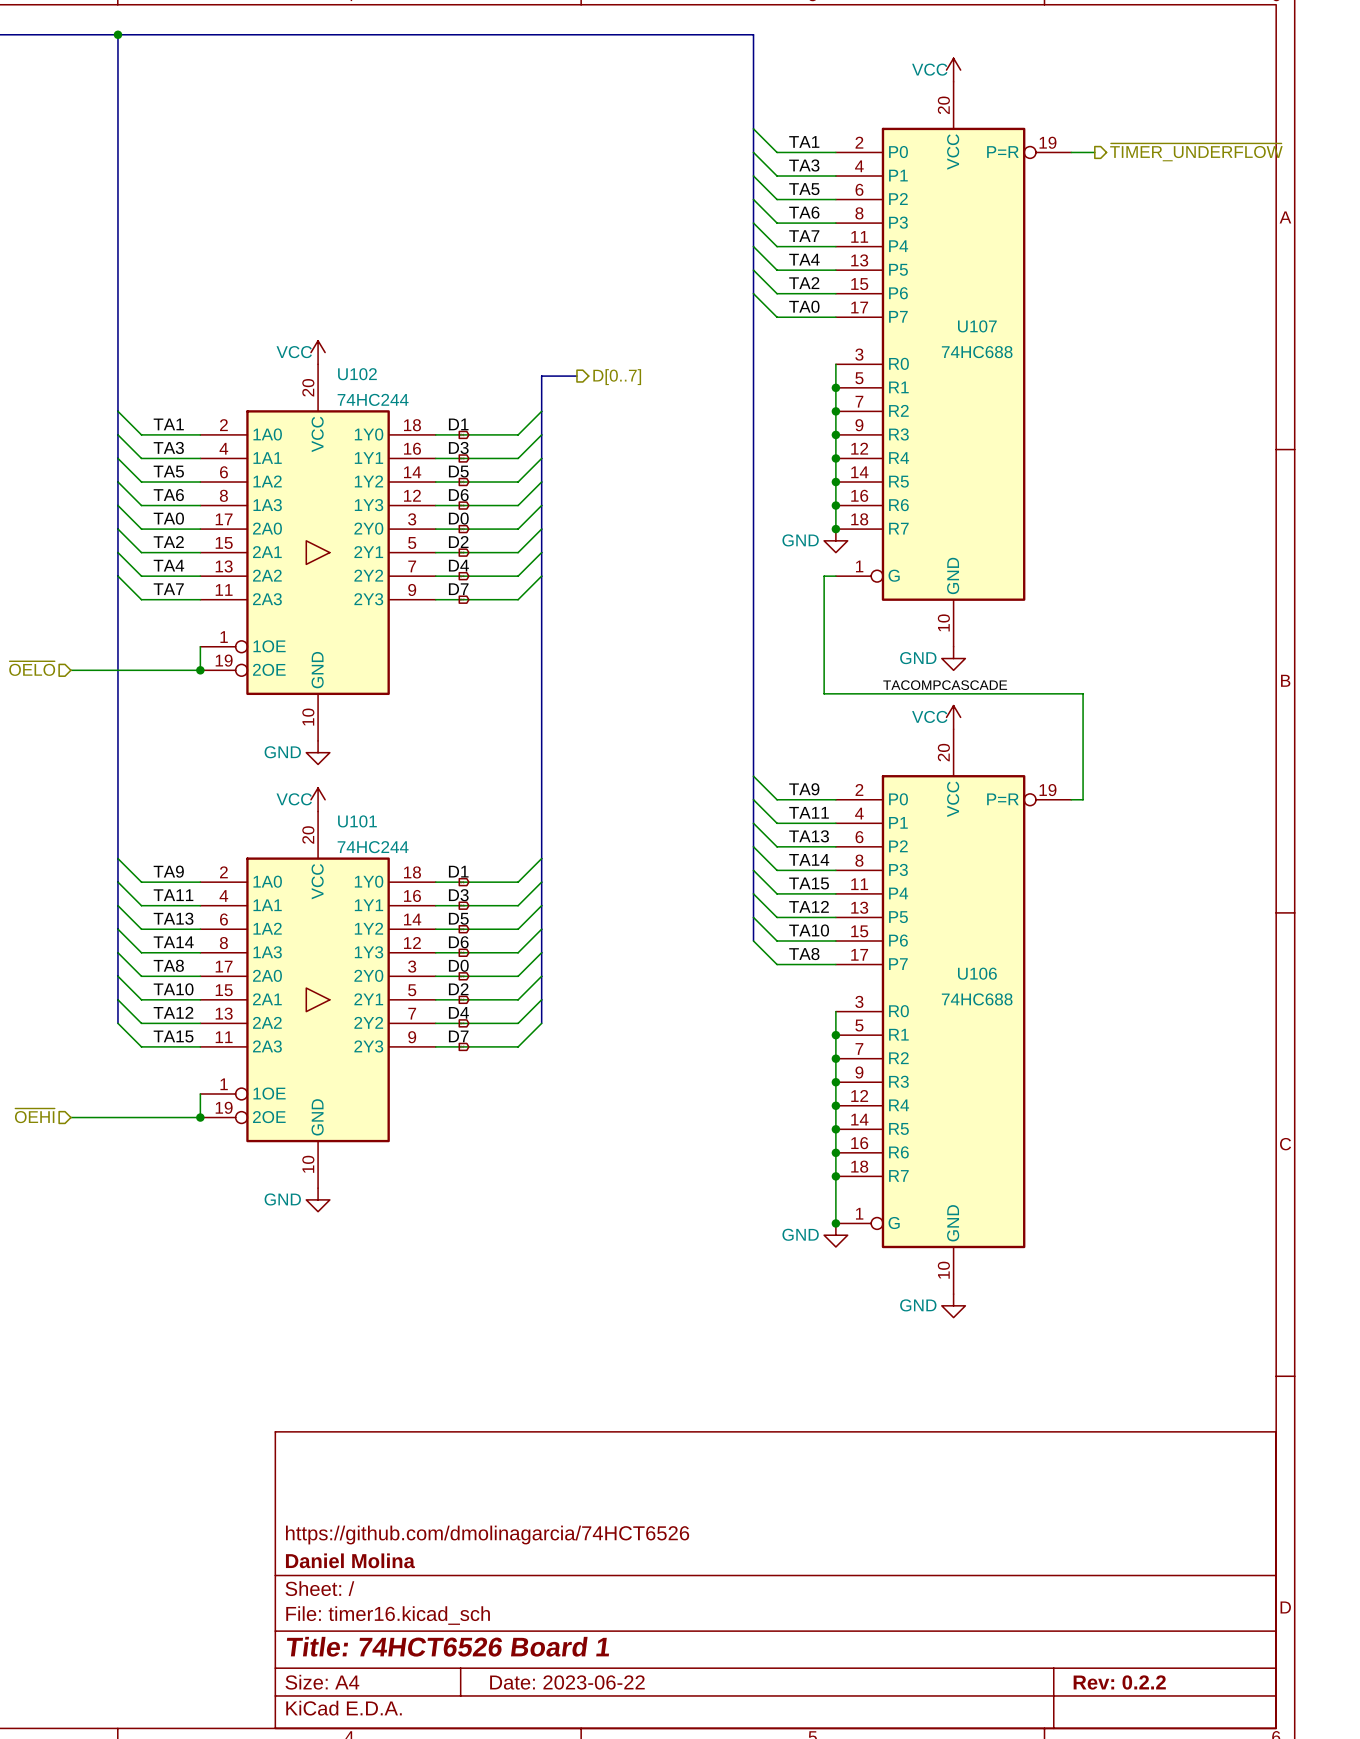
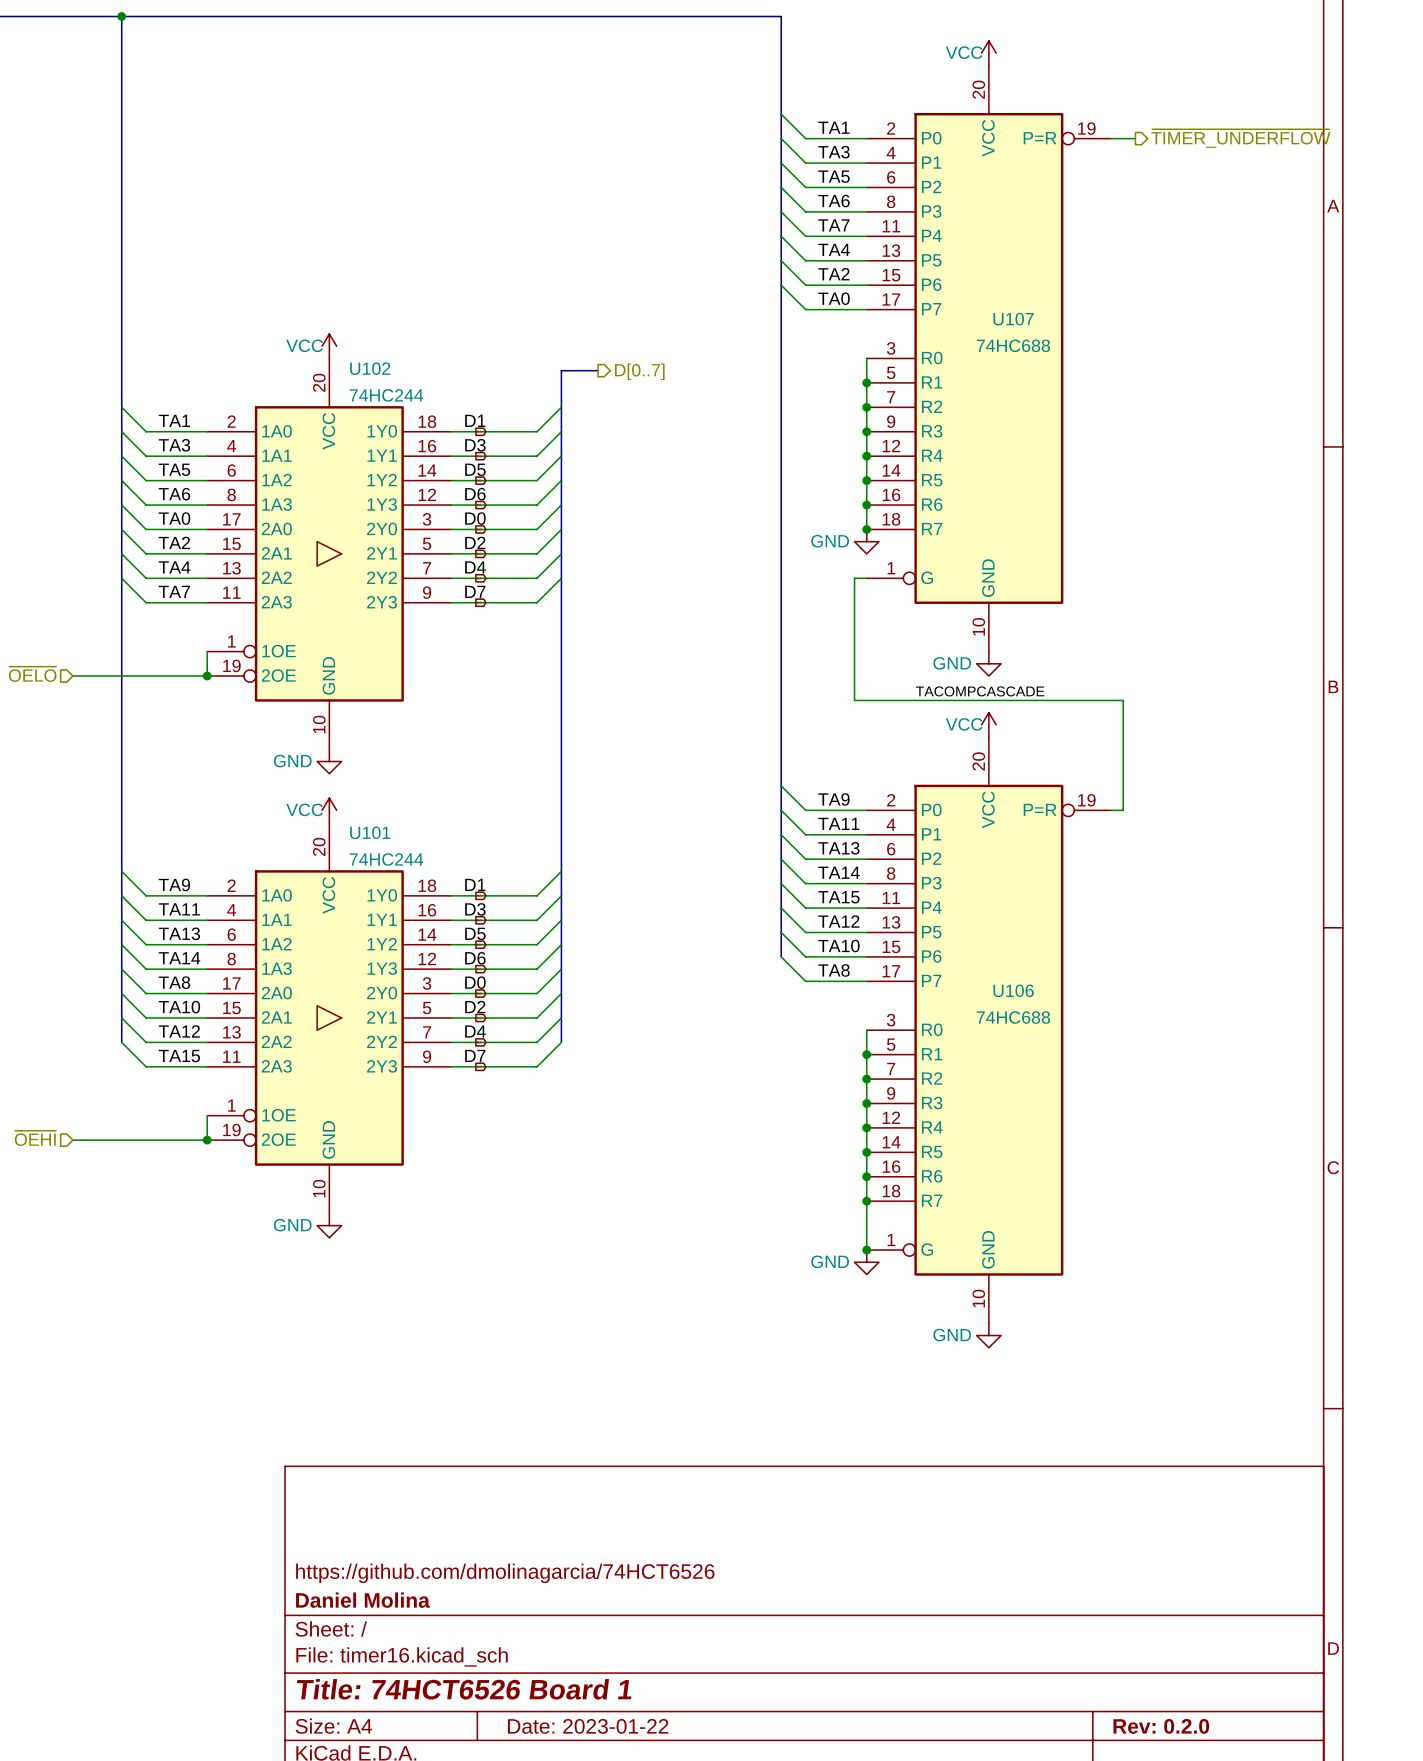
title block: Date: 2023-06-22 (567, 1682) -> Date: 2023-01-22 (588, 1726)
title block: Rev: 0.2.2 (1119, 1682) -> Rev: 0.2.0 (1161, 1726)

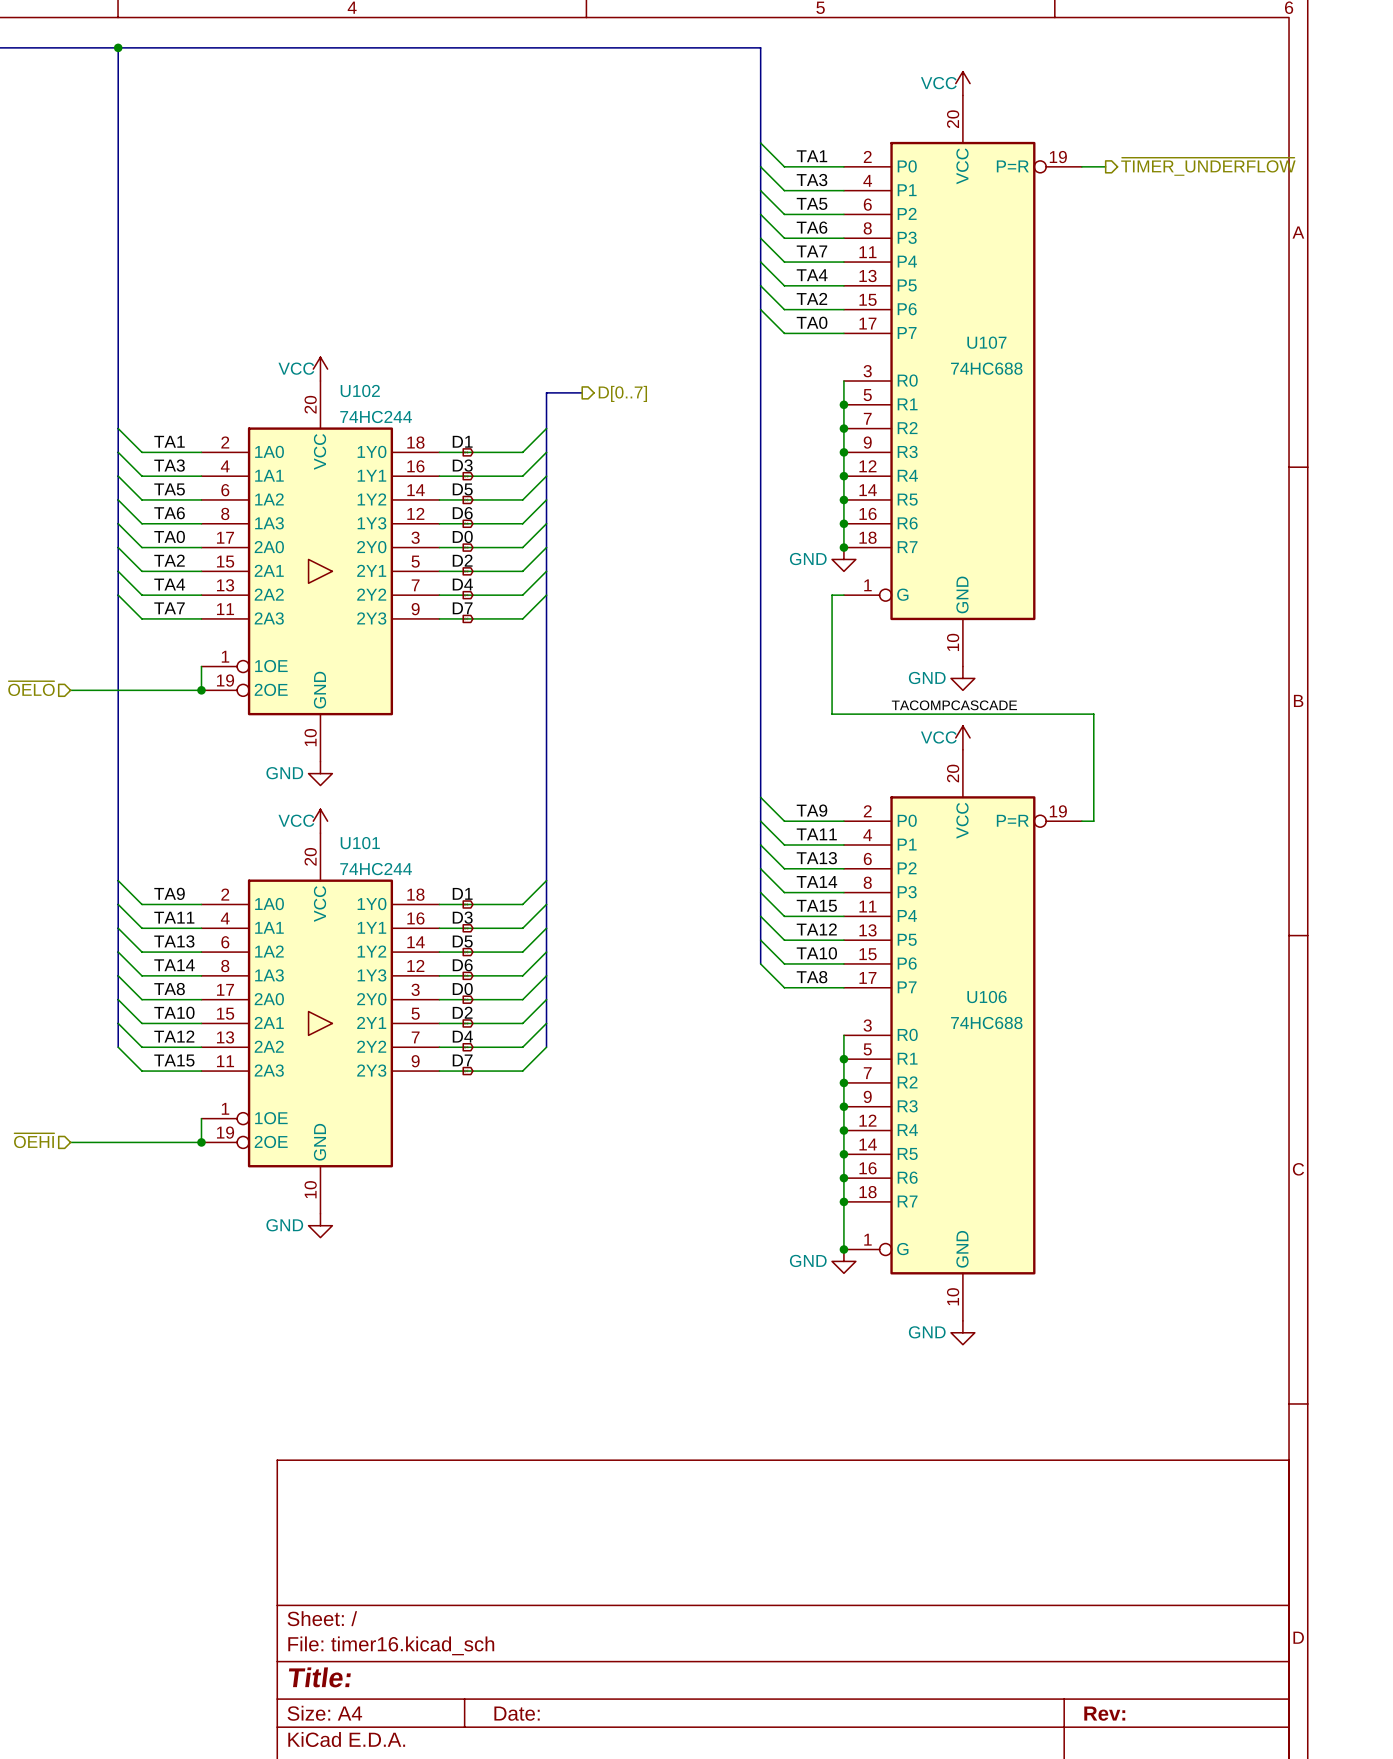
title block: https://github.com/dmolinagarcia/74HCT6526 (505, 1573) -> none
title block: Daniel Molina (362, 1600) -> none
title block: Title: 74HCT6526 Board 1 (464, 1689) -> Title: (319, 1677)
title block: Date: 2023-01-22 (588, 1726) -> Date: (517, 1713)
title block: Rev: 0.2.0 (1161, 1726) -> Rev: (1104, 1713)

